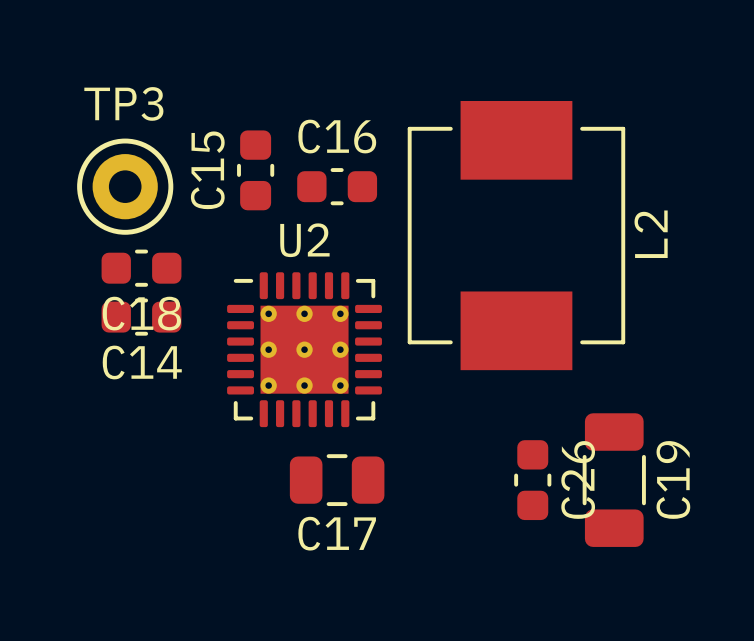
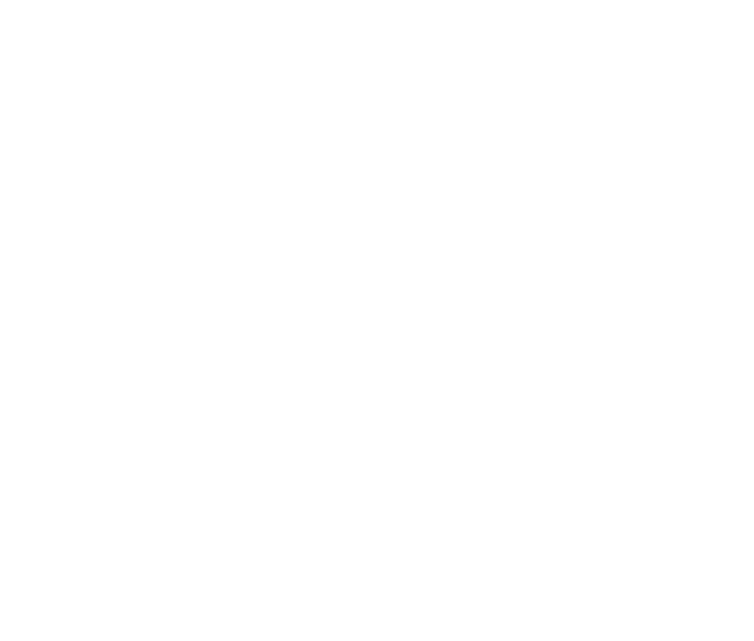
C15: (255, 170) -> none
TP3: (125, 186) -> none
C16: (337, 186) -> none
L2: (516, 235) -> none
C18: (141, 268) -> none
C14: (141, 317) -> none
U2: (304, 349) -> none
C17: (337, 480) -> none
C26: (532, 480) -> none
C19: (614, 480) -> none

